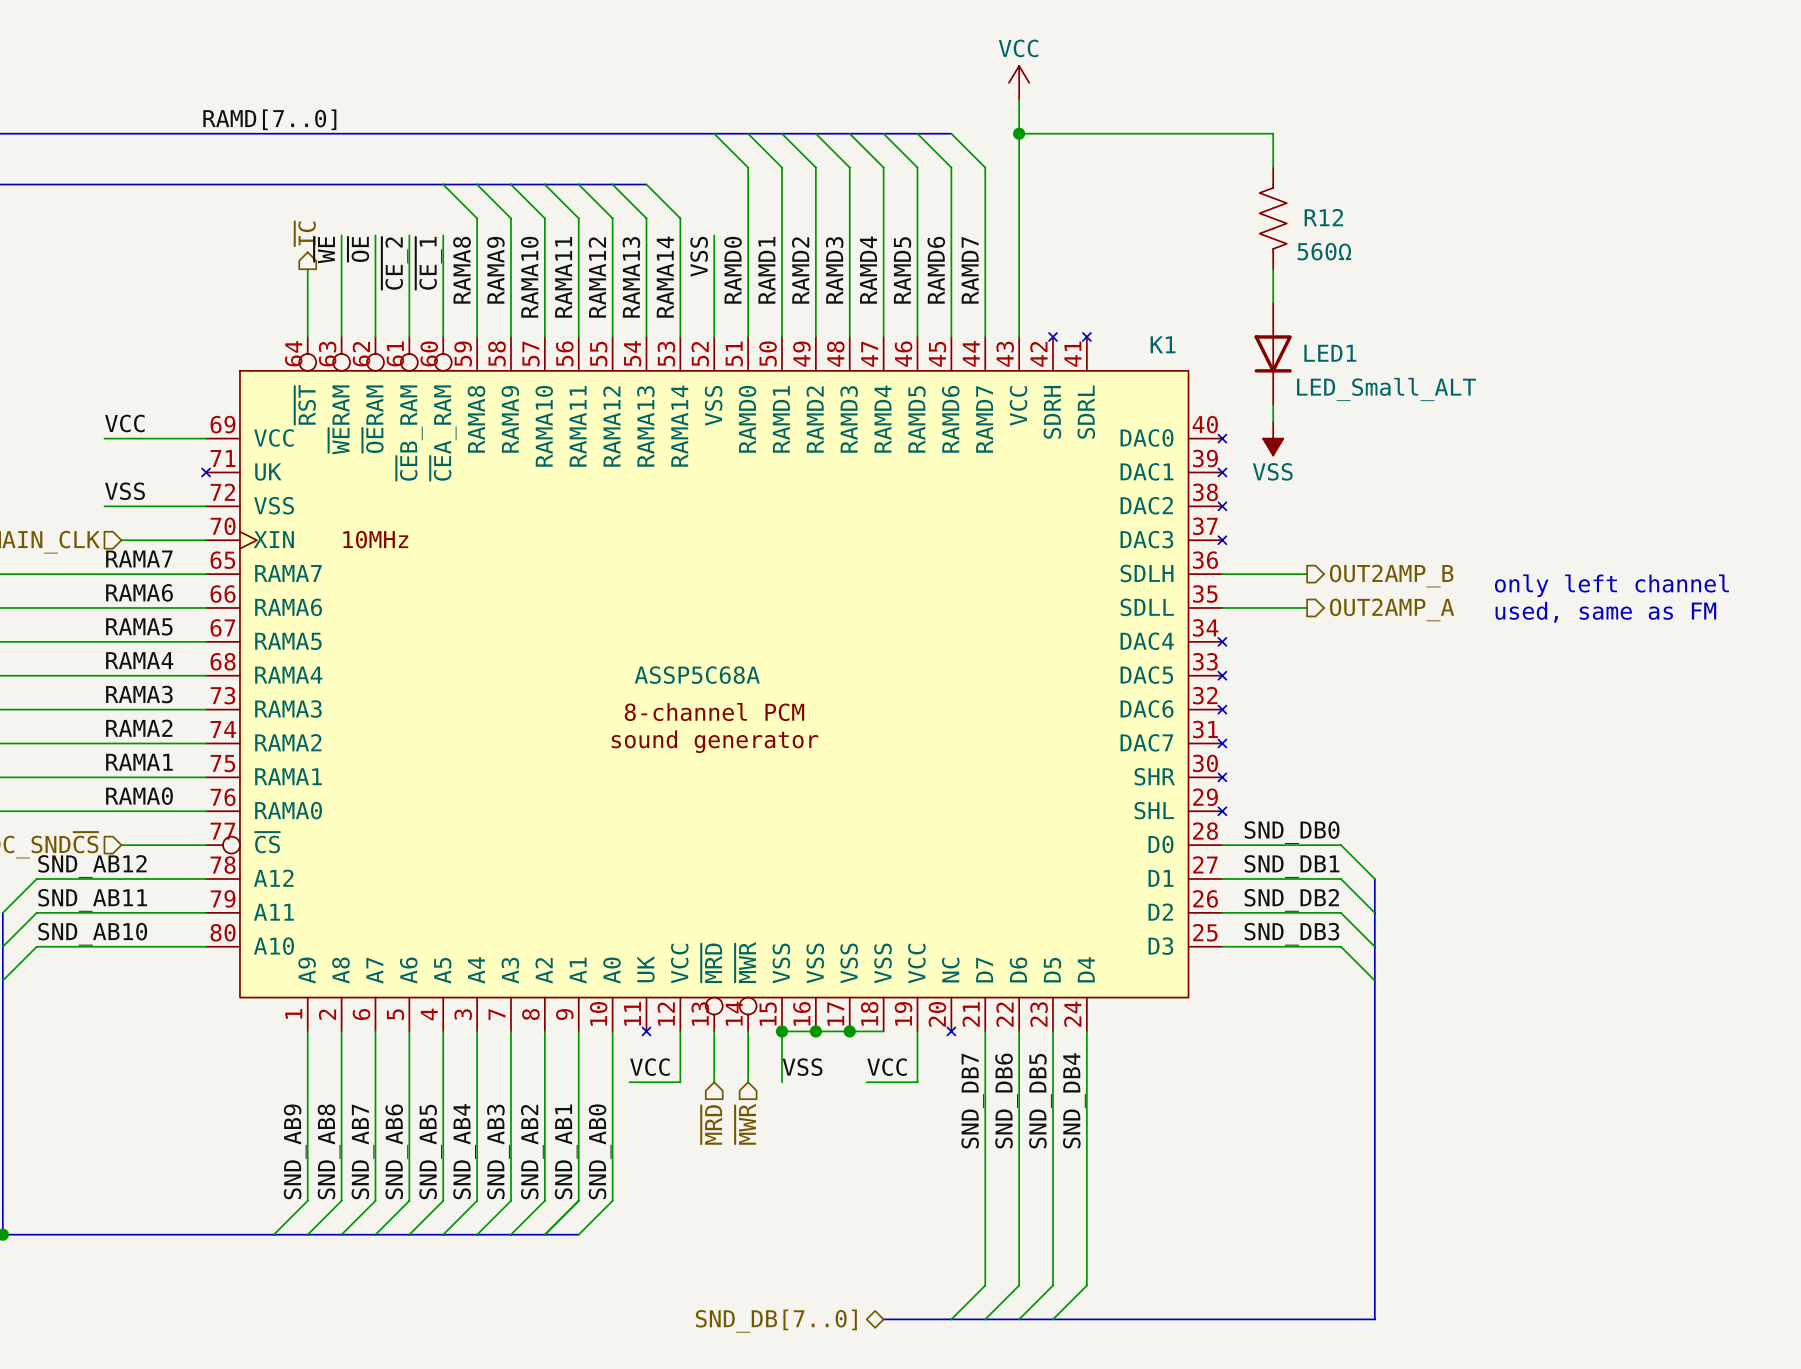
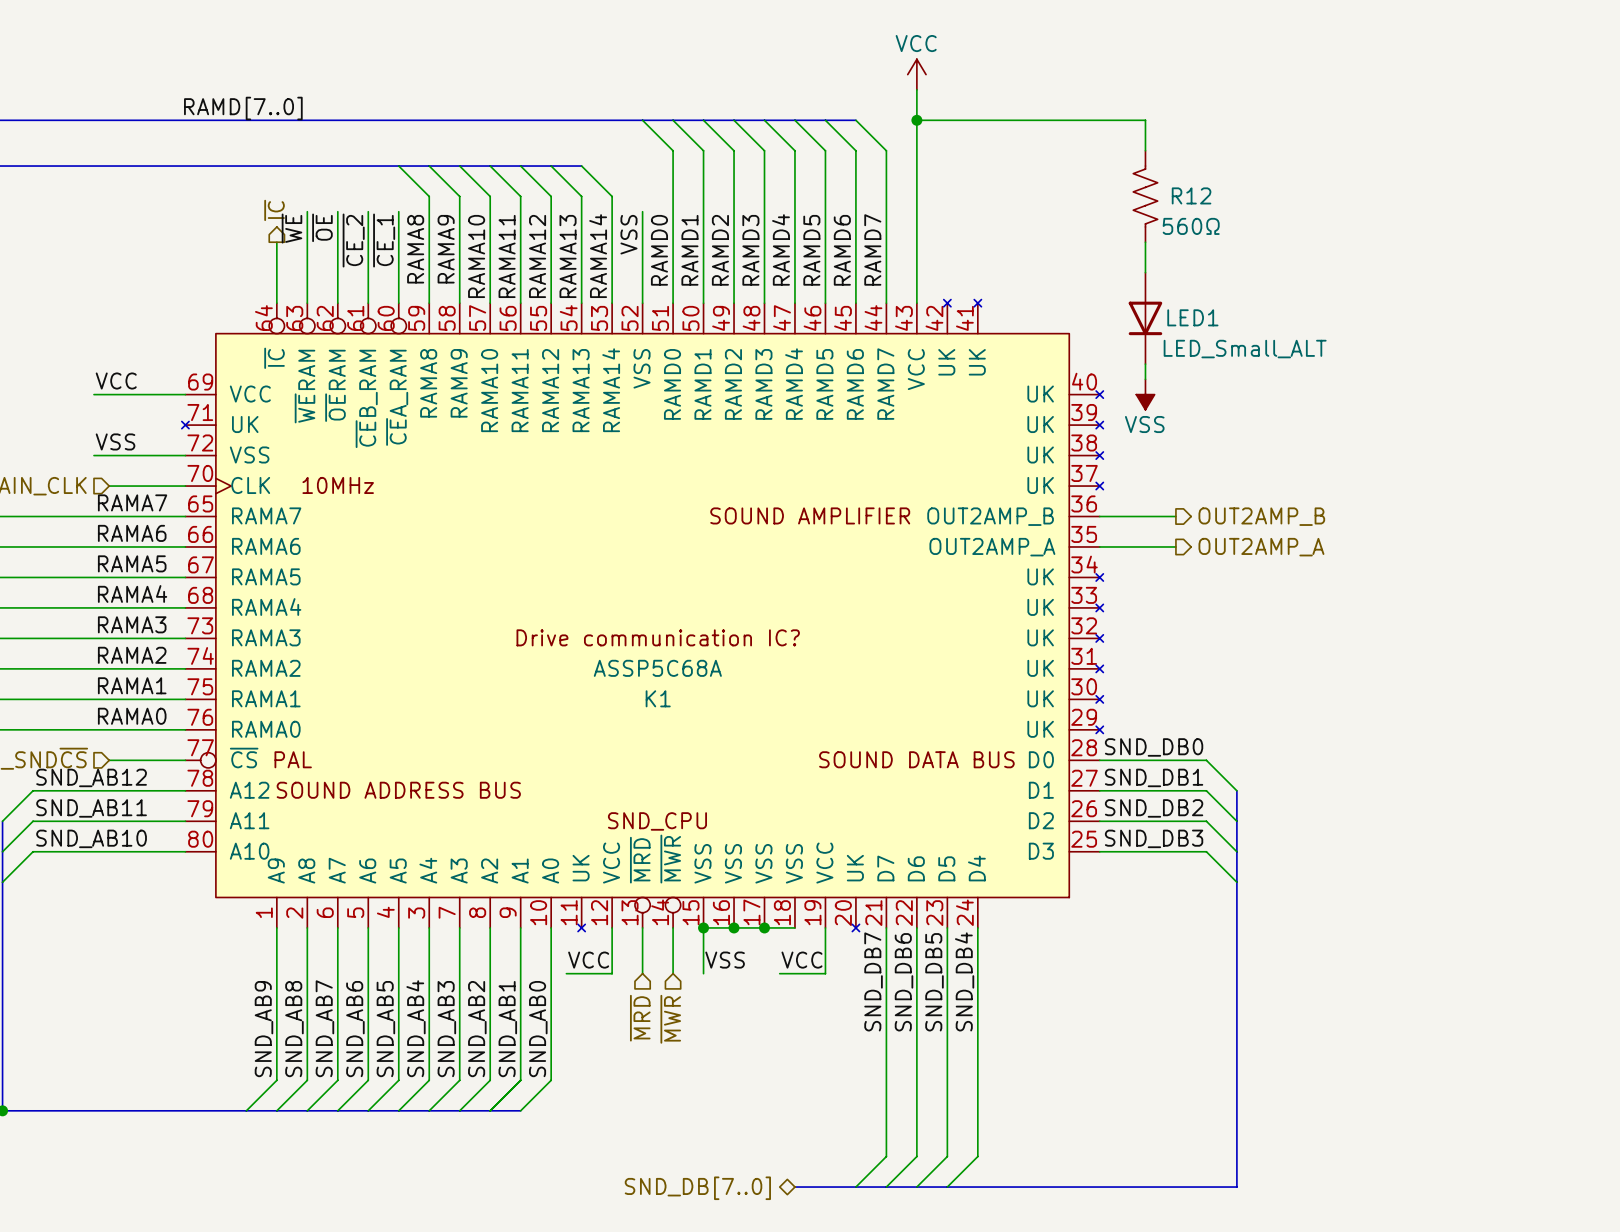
K1 symbol: [202, 332, 1227, 1036] -> [181, 299, 1104, 932]
K1 name position: K1 (1163, 344) -> K1 (658, 698)
text: only left channel (1611, 585) -> none
text: used, same as FM (1605, 612) -> none
K1 value position: ASSP5C68A (697, 675) -> ASSP5C68A (657, 668)

